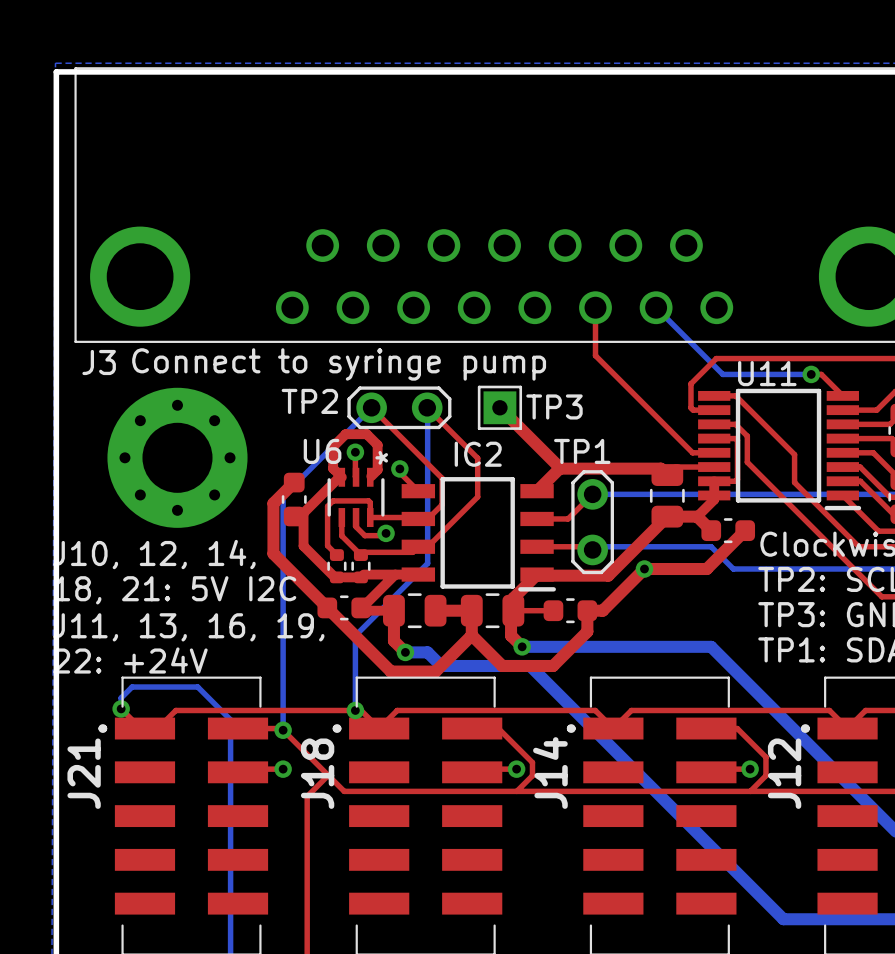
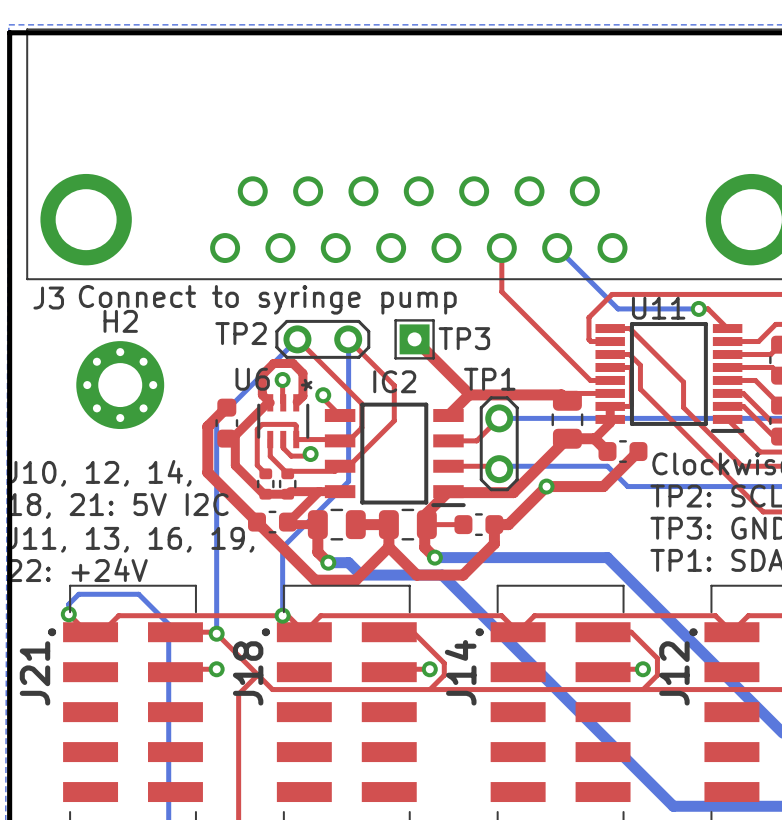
part: (177, 457) -> none
H2: none -> (120, 385)

